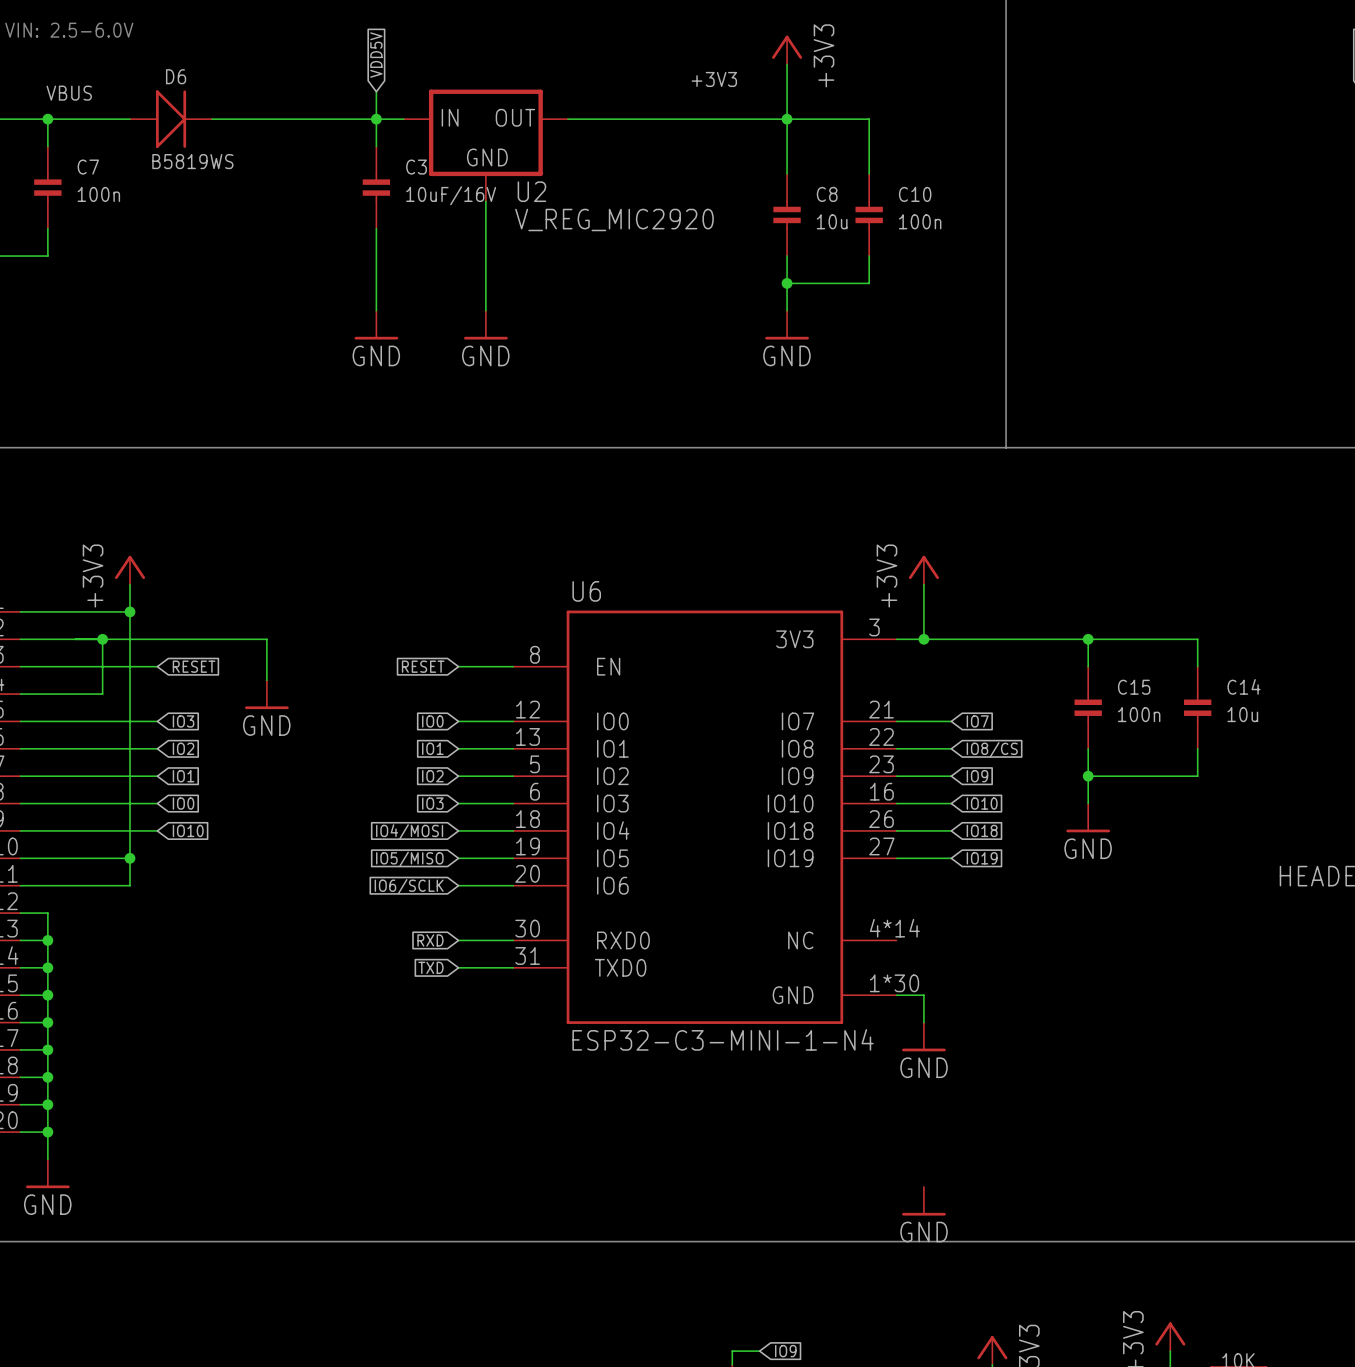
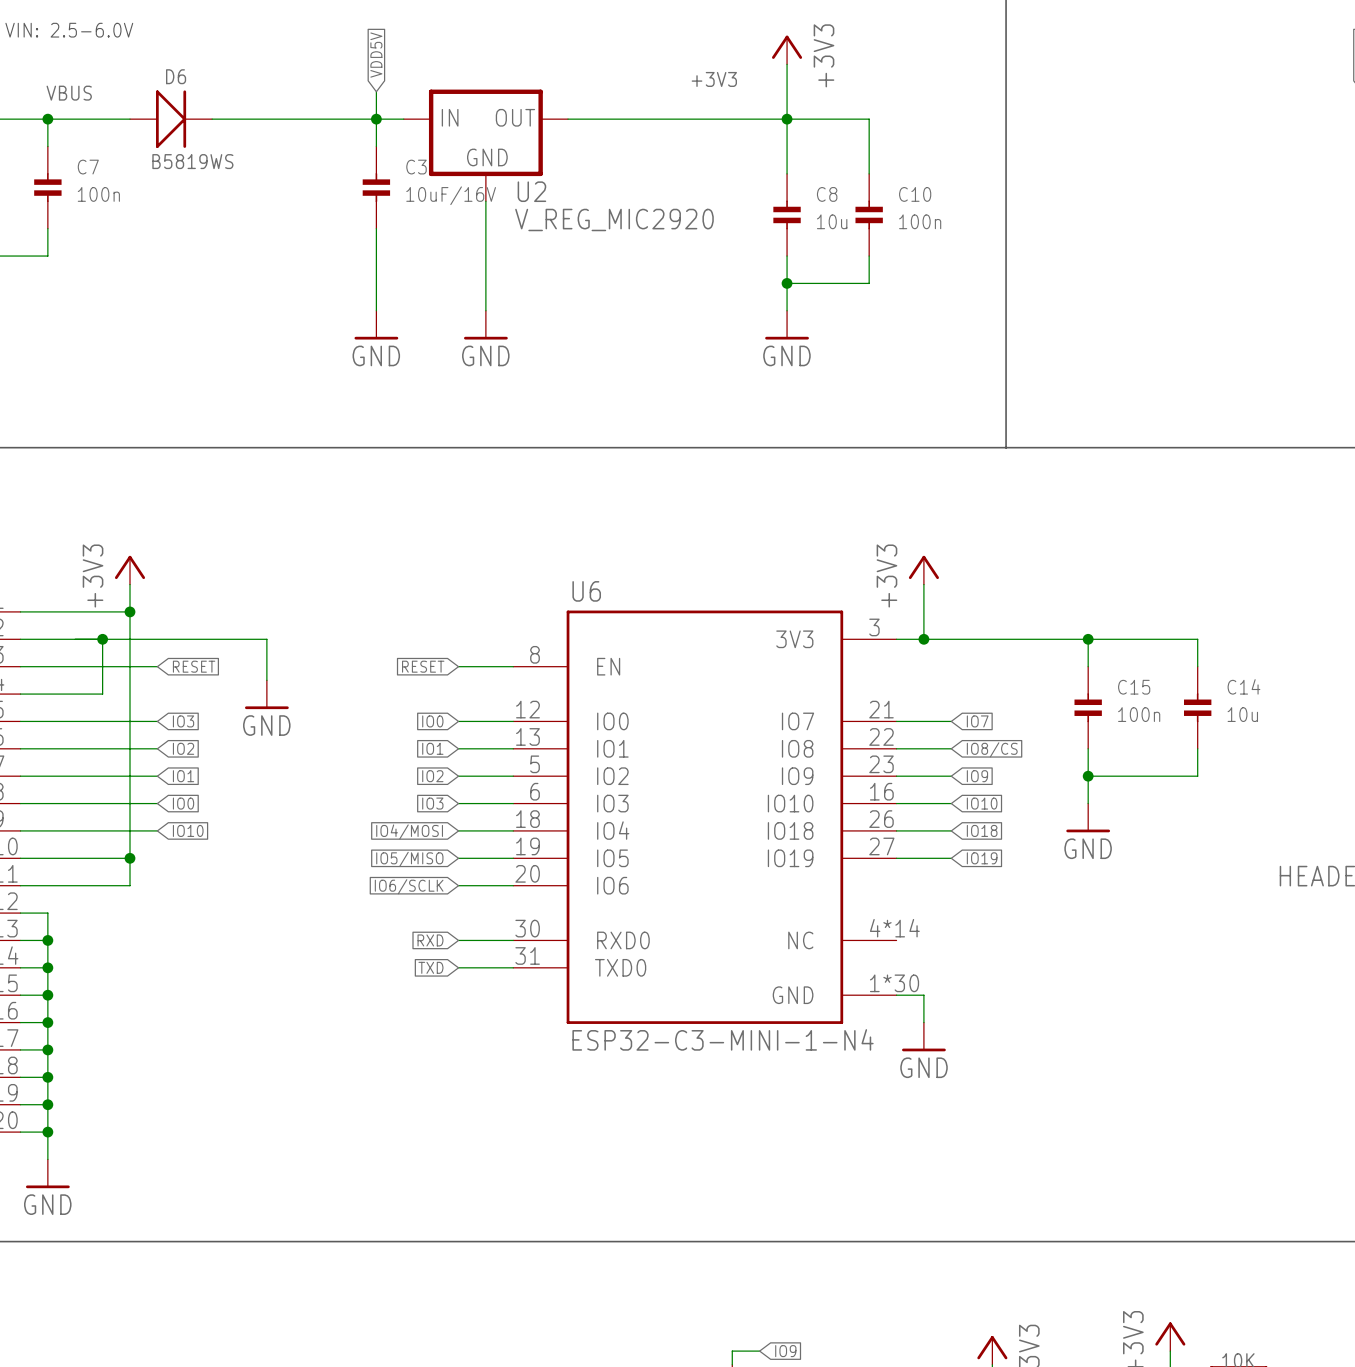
power symbol: GND (923, 1201) -> none

